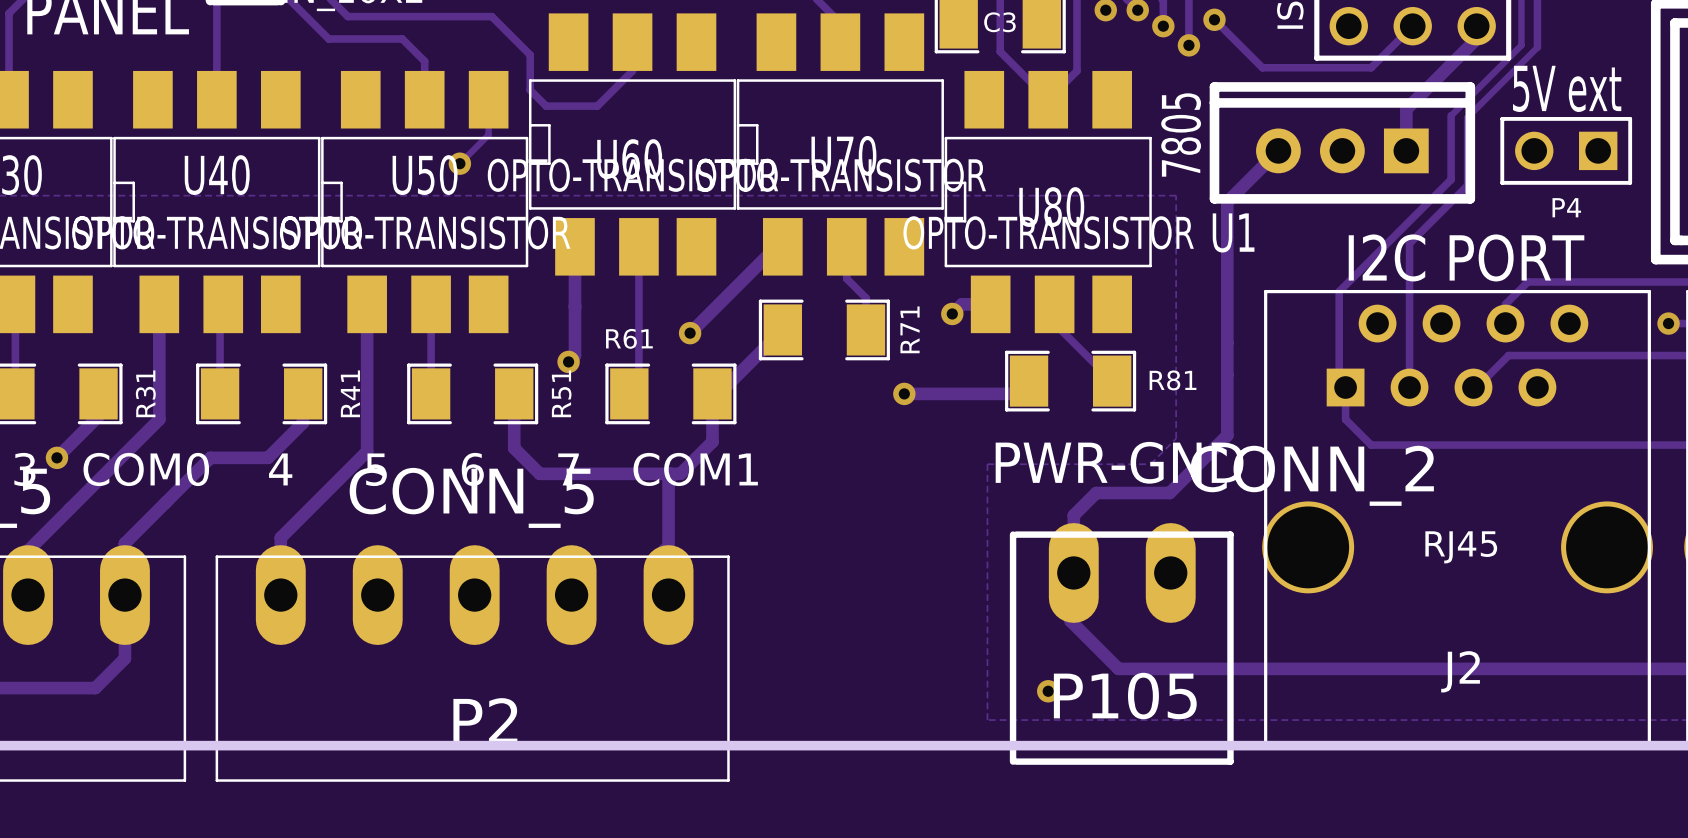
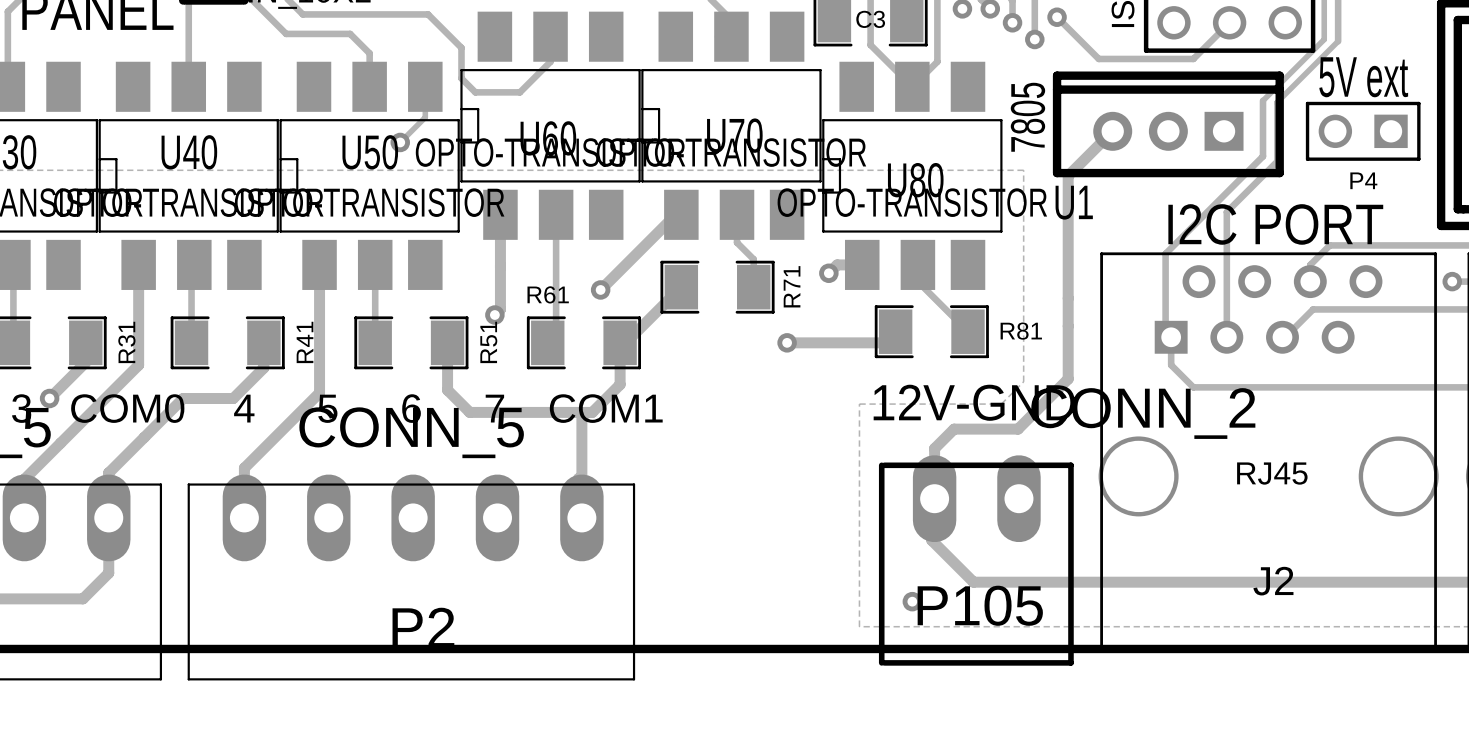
track: (1476, 26) (1476, 38) (1406, 109) (1406, 150) -> none
text: PWR-GND (1119, 462) -> 12V-GND (974, 402)

